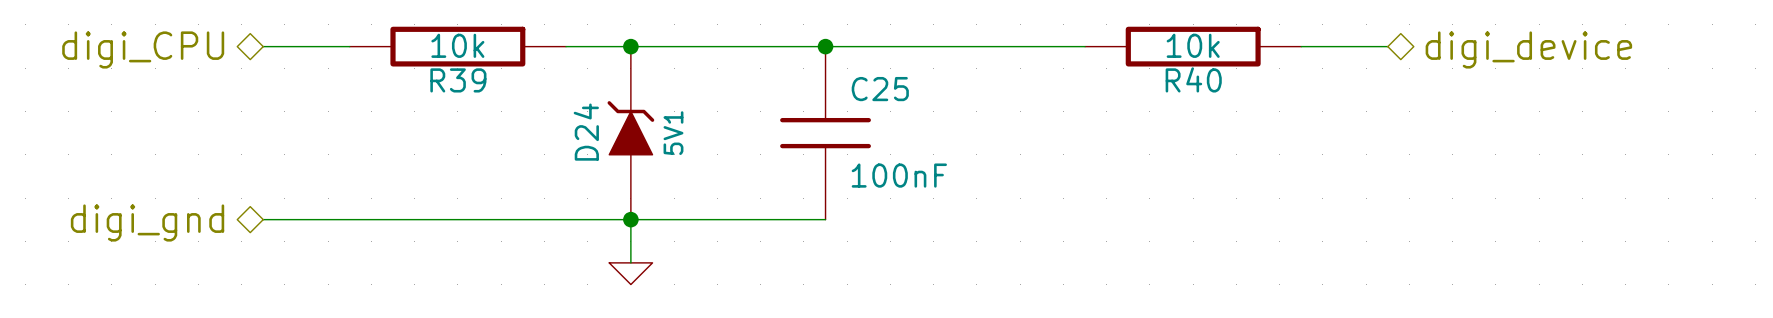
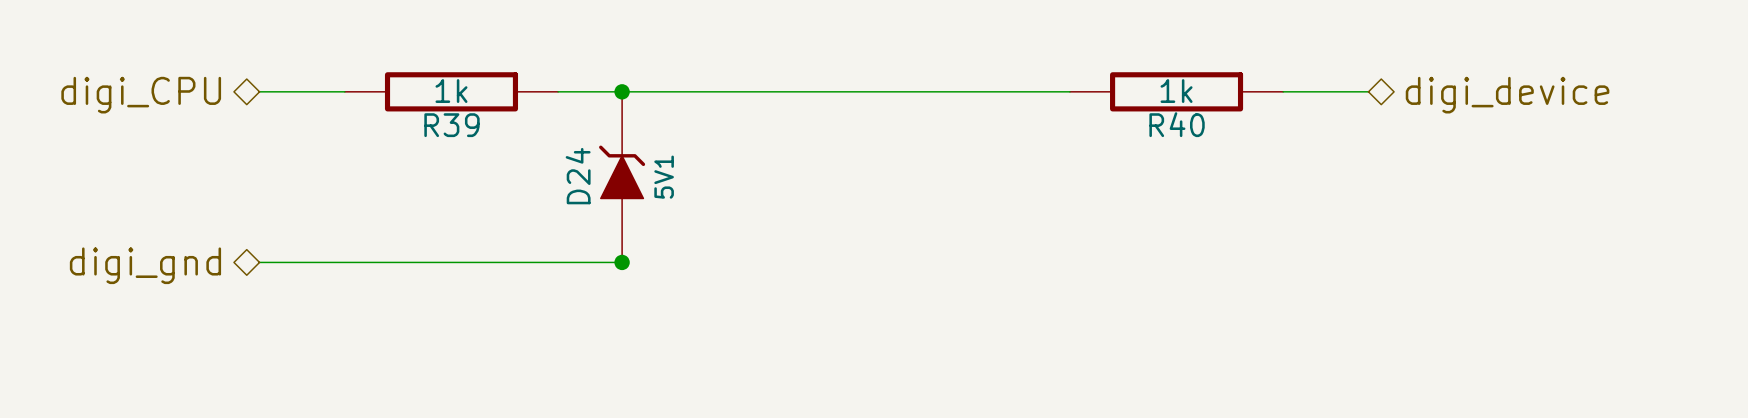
R39 value: 10k (457, 45) -> 1k (451, 91)
R40 value: 10k (1193, 45) -> 1k (1176, 91)
junction: (825, 46) -> none
C25: 100nF (825, 133) -> none
wire: (825, 219) (630, 219) (630, 262) -> none
power symbol: (630, 273) -> none

